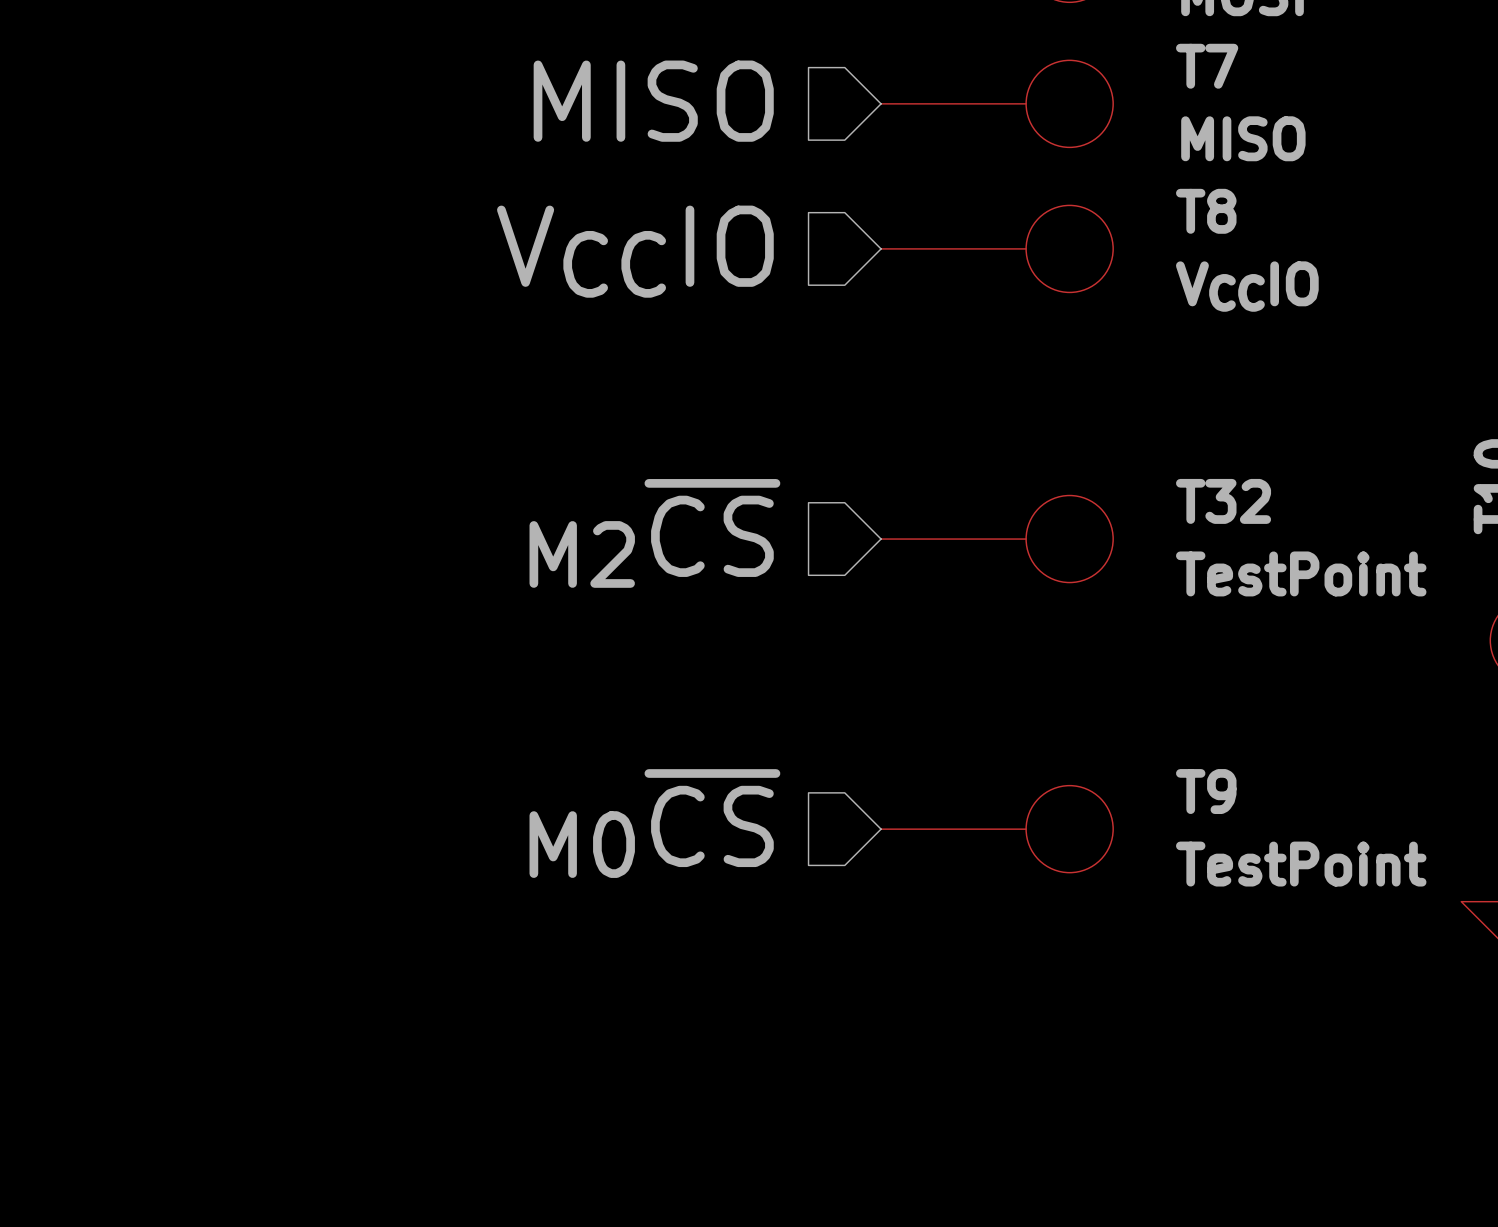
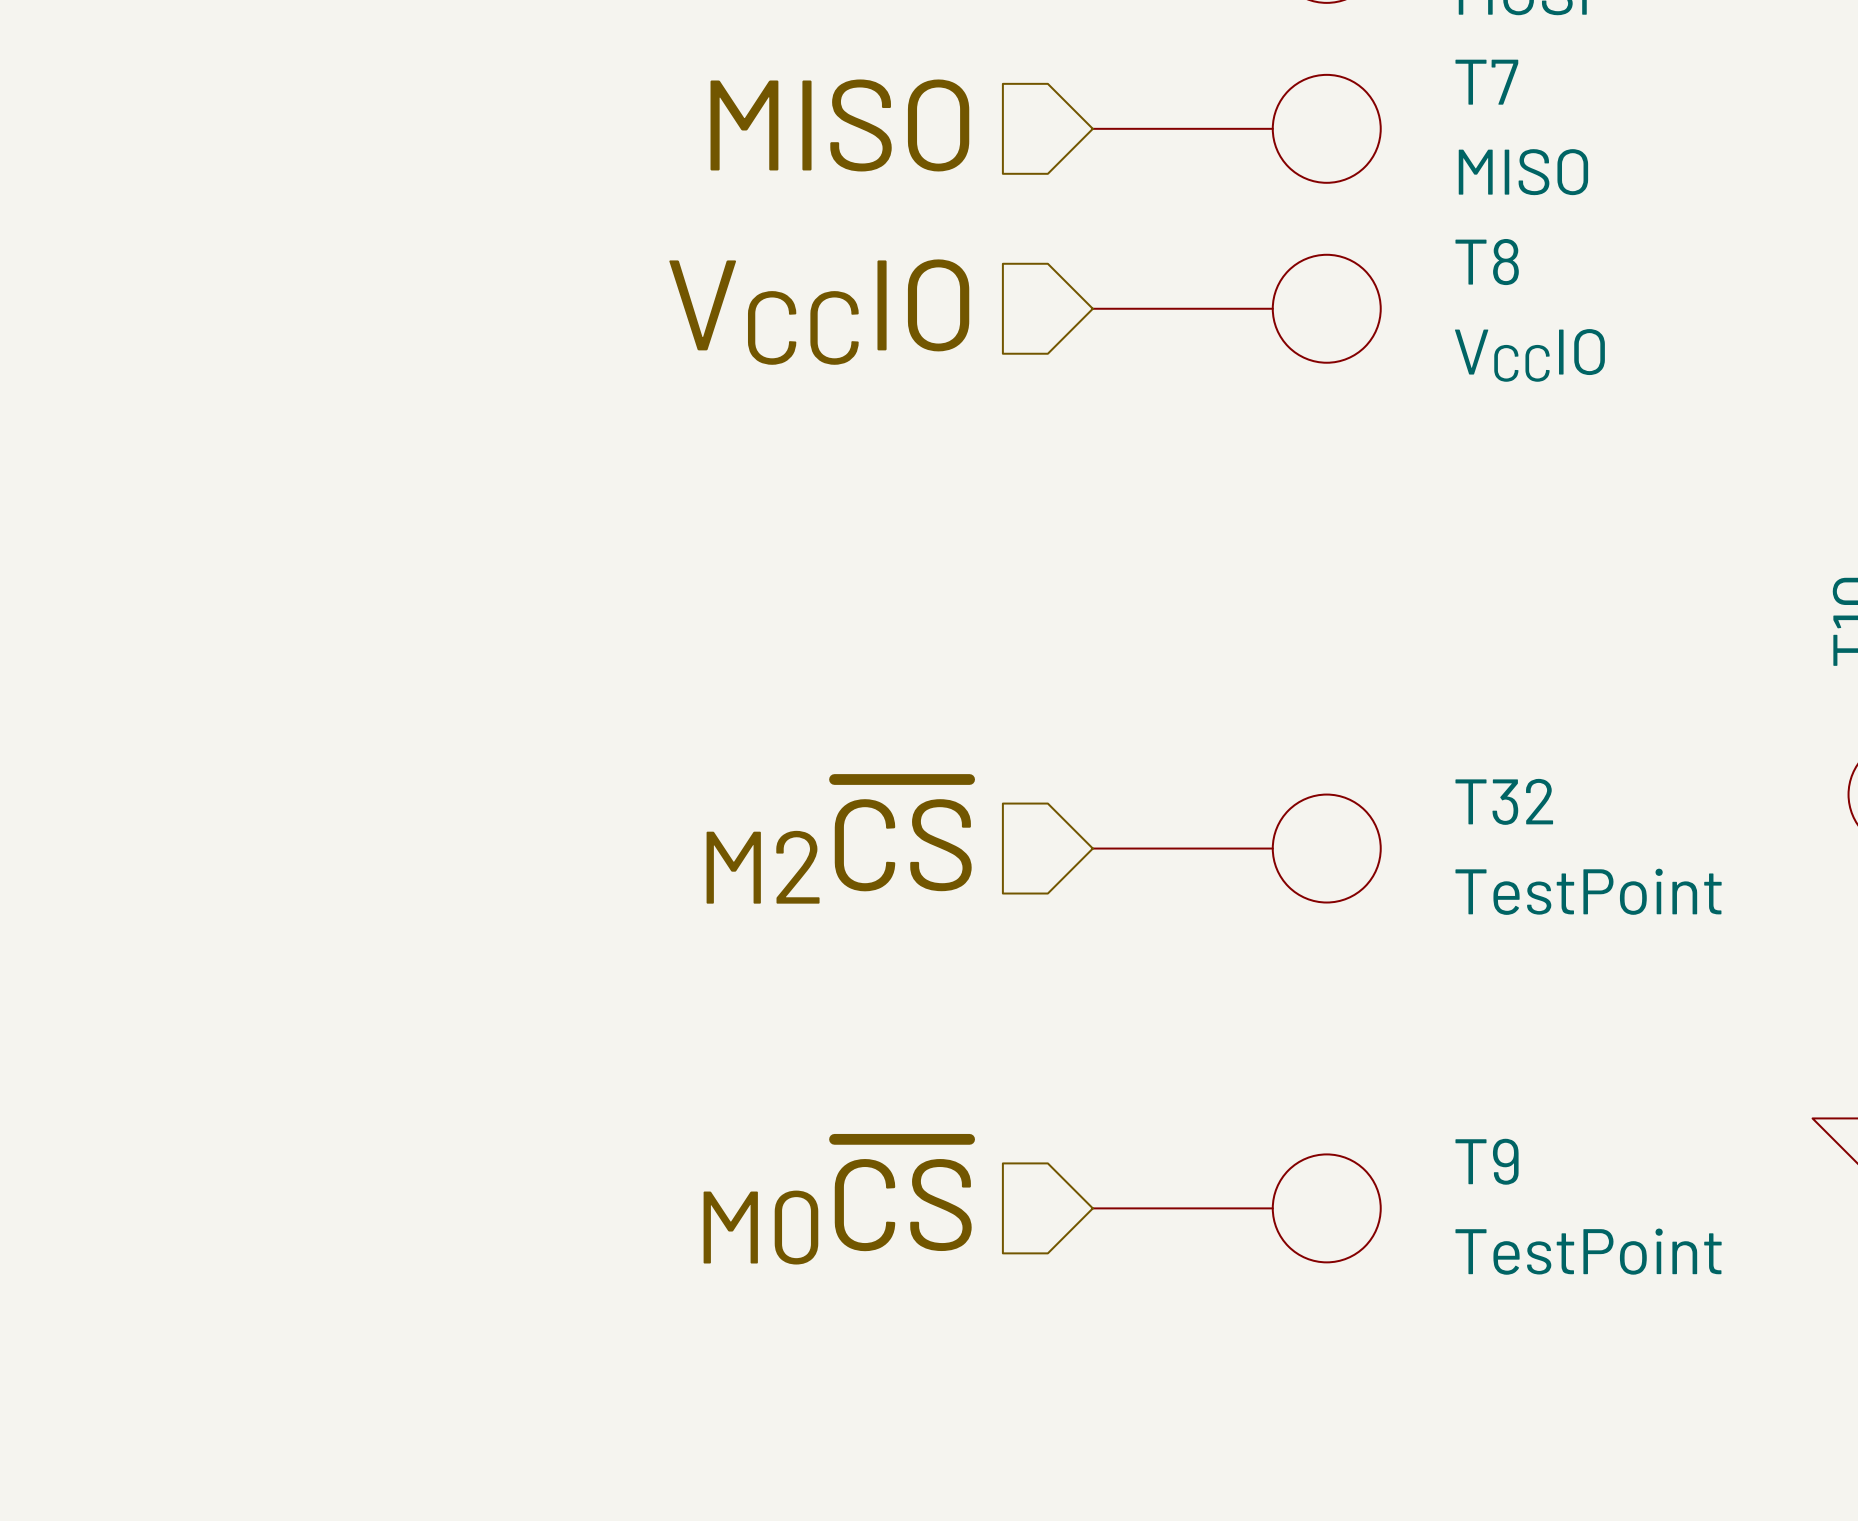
hierarchical label position: M2~{CS} (654, 533) -> M2~{CS} (839, 841)
T32 position: (997, 539) -> (1236, 848)
hierarchical label position: M0~{CS} (654, 823) -> M0~{CS} (837, 1201)
T9 position: (997, 829) -> (1236, 1208)

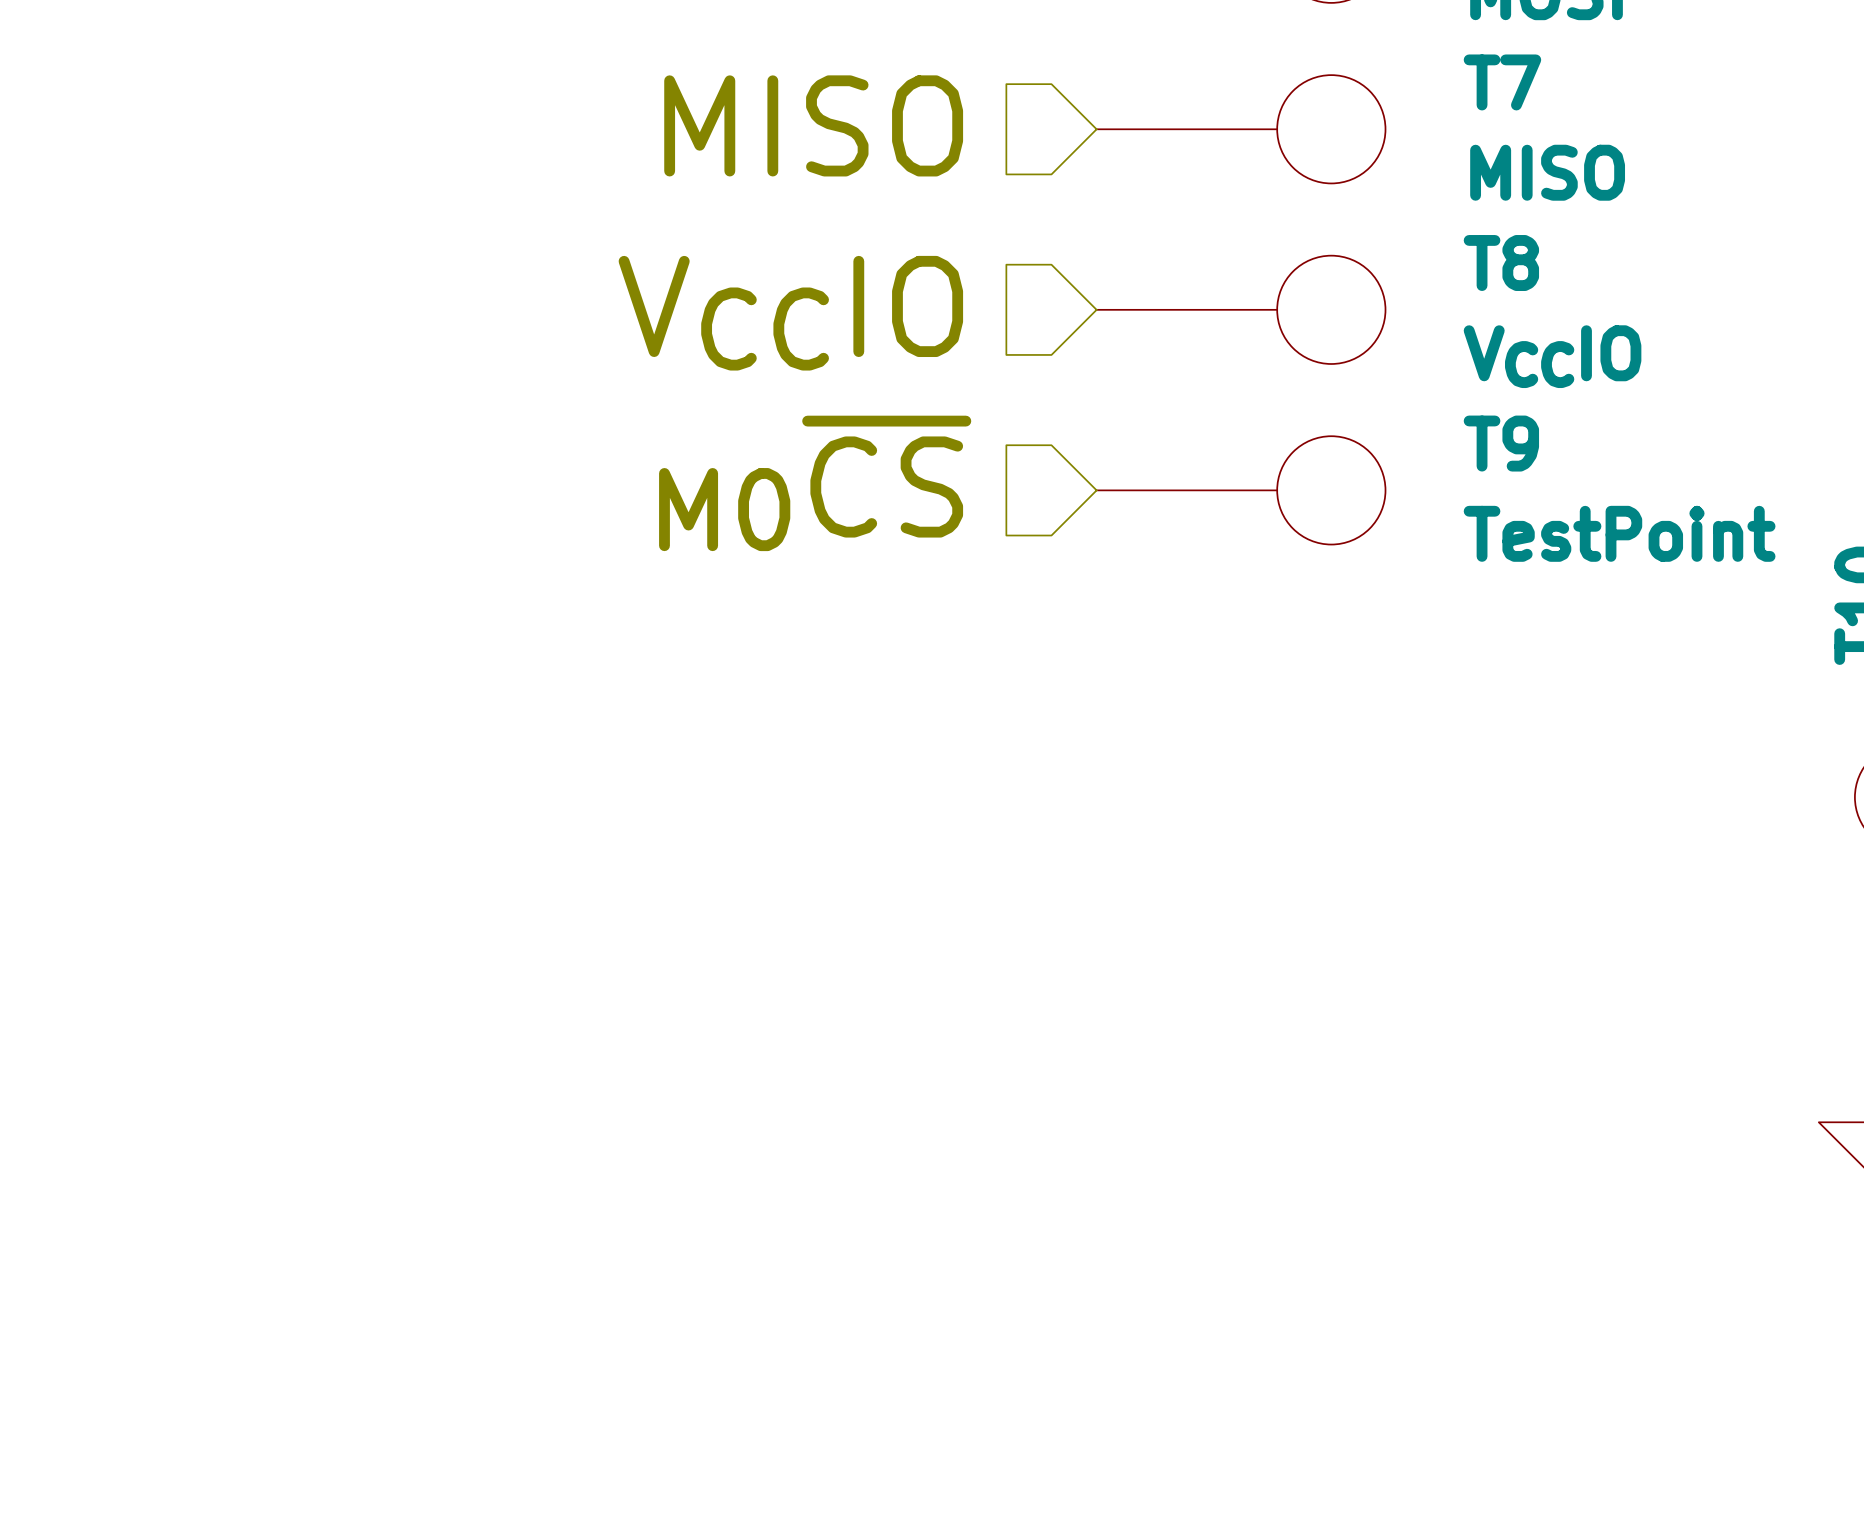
hierarchical label: M2~{CS} (839, 841) -> none
T32: TestPoint (1236, 848) -> none
hierarchical label position: M0~{CS} (837, 1201) -> M0~{CS} (815, 483)
T9 position: (1236, 1208) -> (1241, 490)

